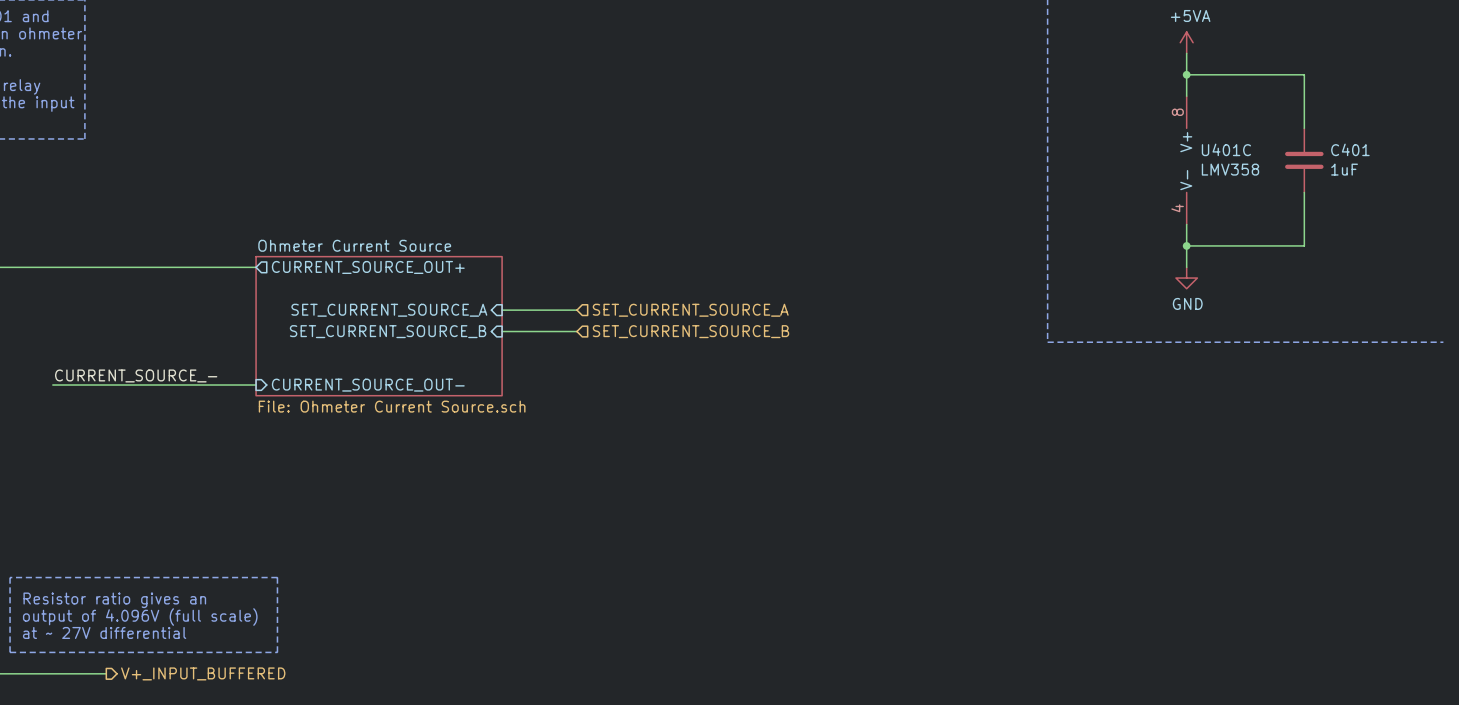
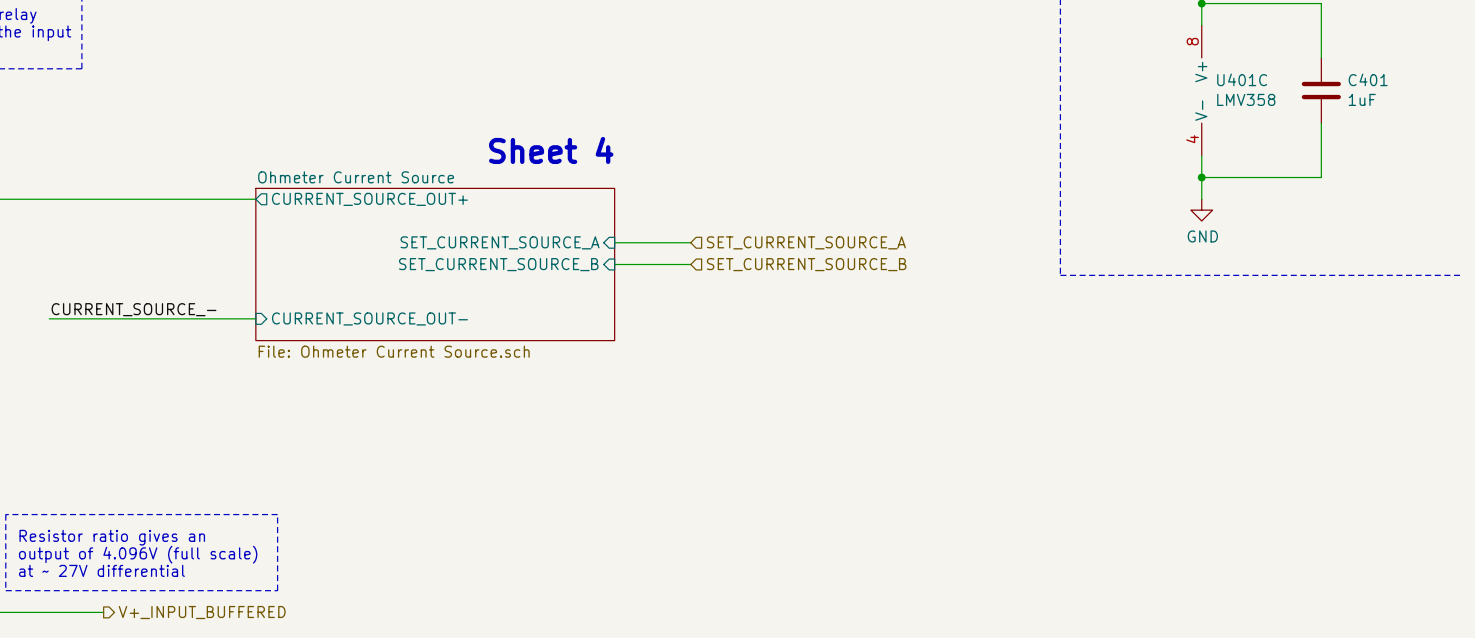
text: none -> Sheet 4 (551, 150)
sheet pin position: SET_CURRENT_SOURCE_A (389, 310) -> SET_CURRENT_SOURCE_A (500, 242)
wire: (502, 310) (576, 310) -> (614, 242) (690, 242)
hierarchical label position: SET_CURRENT_SOURCE_A (690, 310) -> SET_CURRENT_SOURCE_A (806, 242)
sheet Ohmeter Current Source: File: Ohmeter Current Source.sch (379, 326) -> none
sheet pin position: SET_CURRENT_SOURCE_B (388, 331) -> SET_CURRENT_SOURCE_B (498, 264)
sheet Ohmeter Current Source: none -> File: Ohmeter Current Source.sch (435, 264)
wire: (502, 331) (576, 331) -> (614, 264) (690, 264)
hierarchical label position: SET_CURRENT_SOURCE_B (690, 331) -> SET_CURRENT_SOURCE_B (806, 264)

